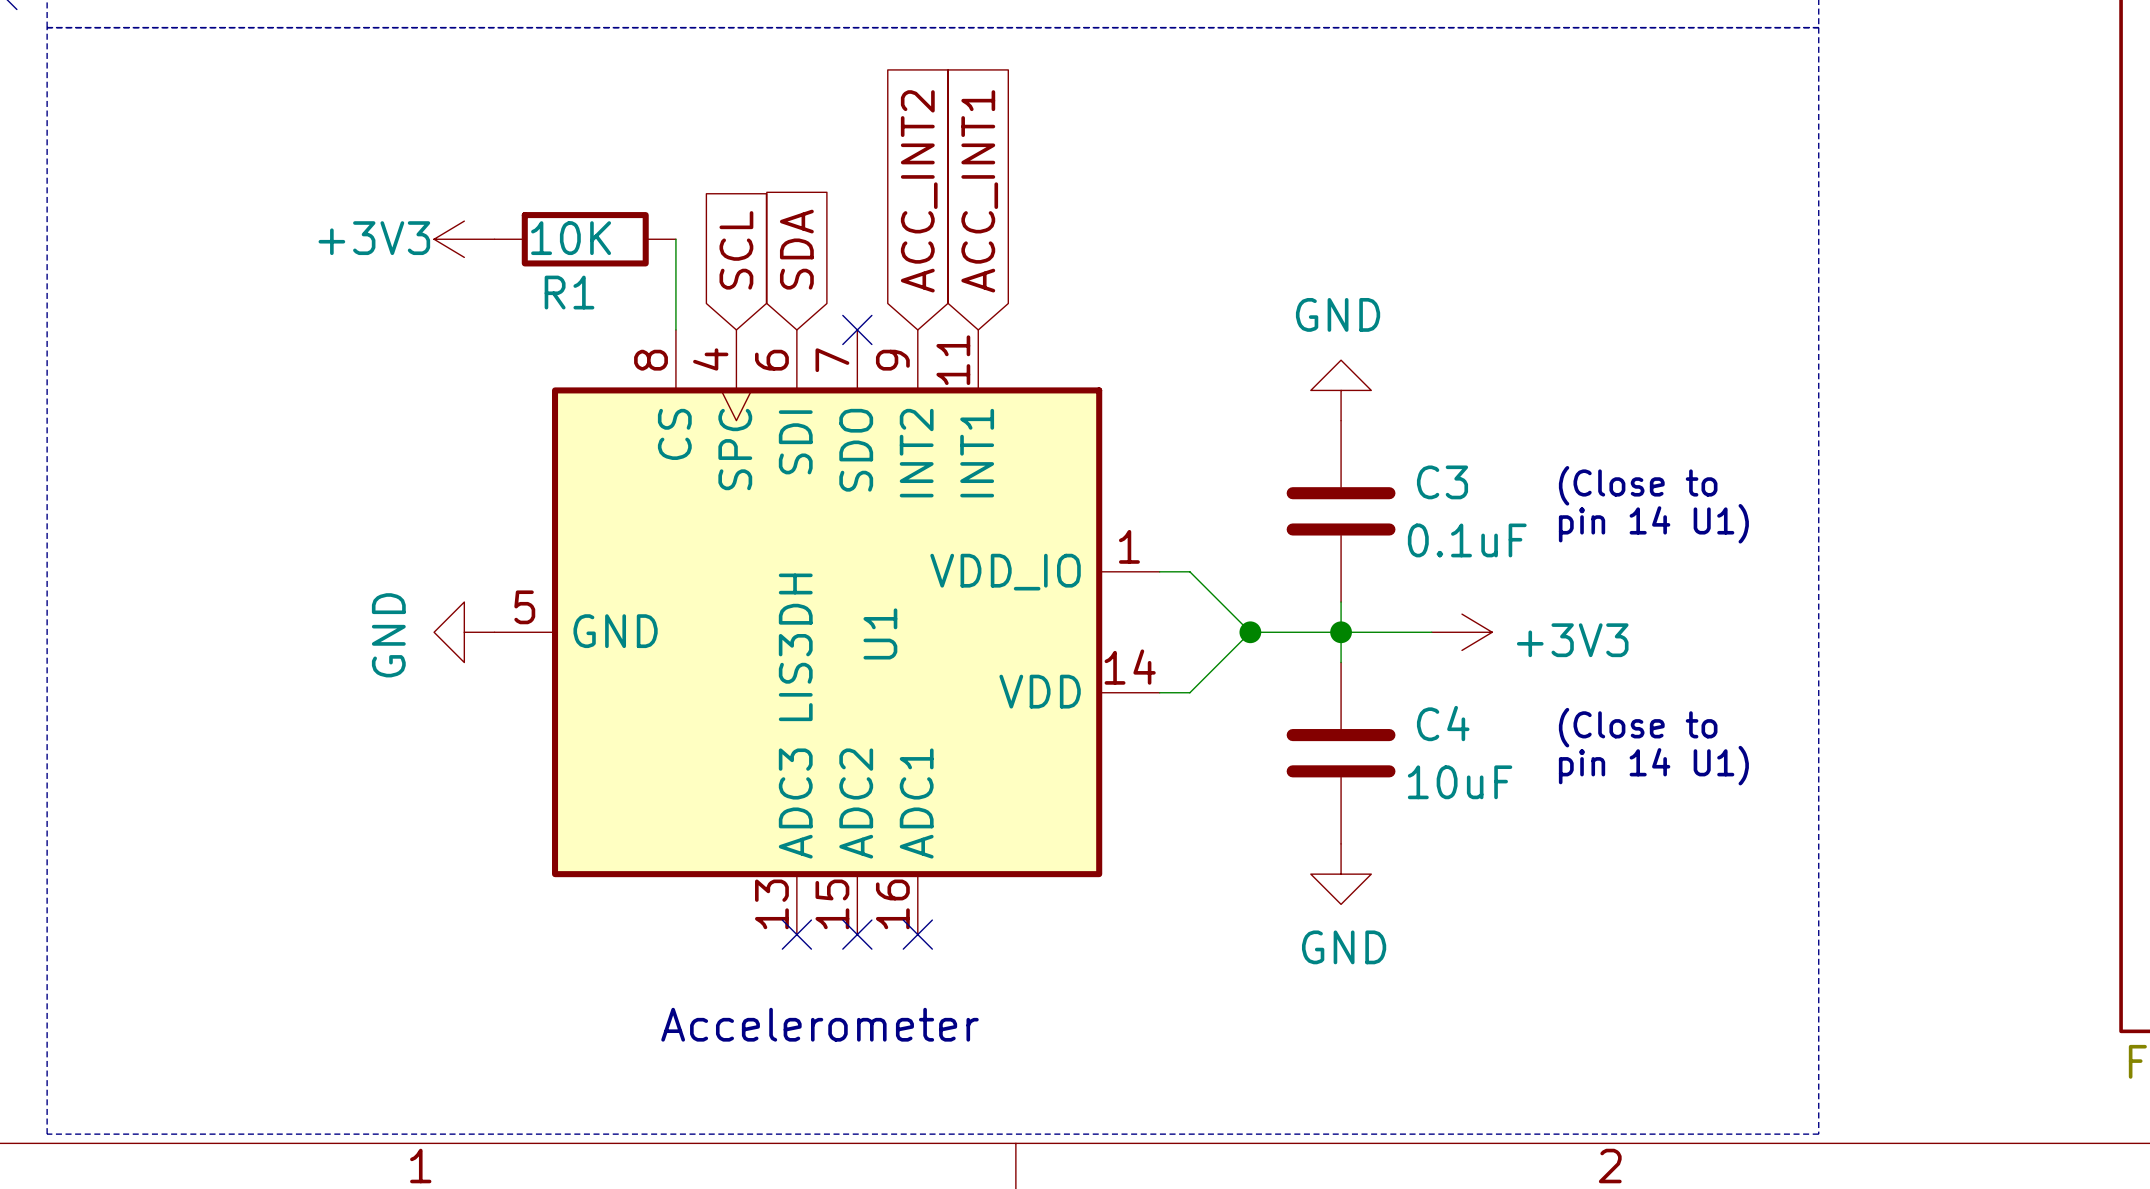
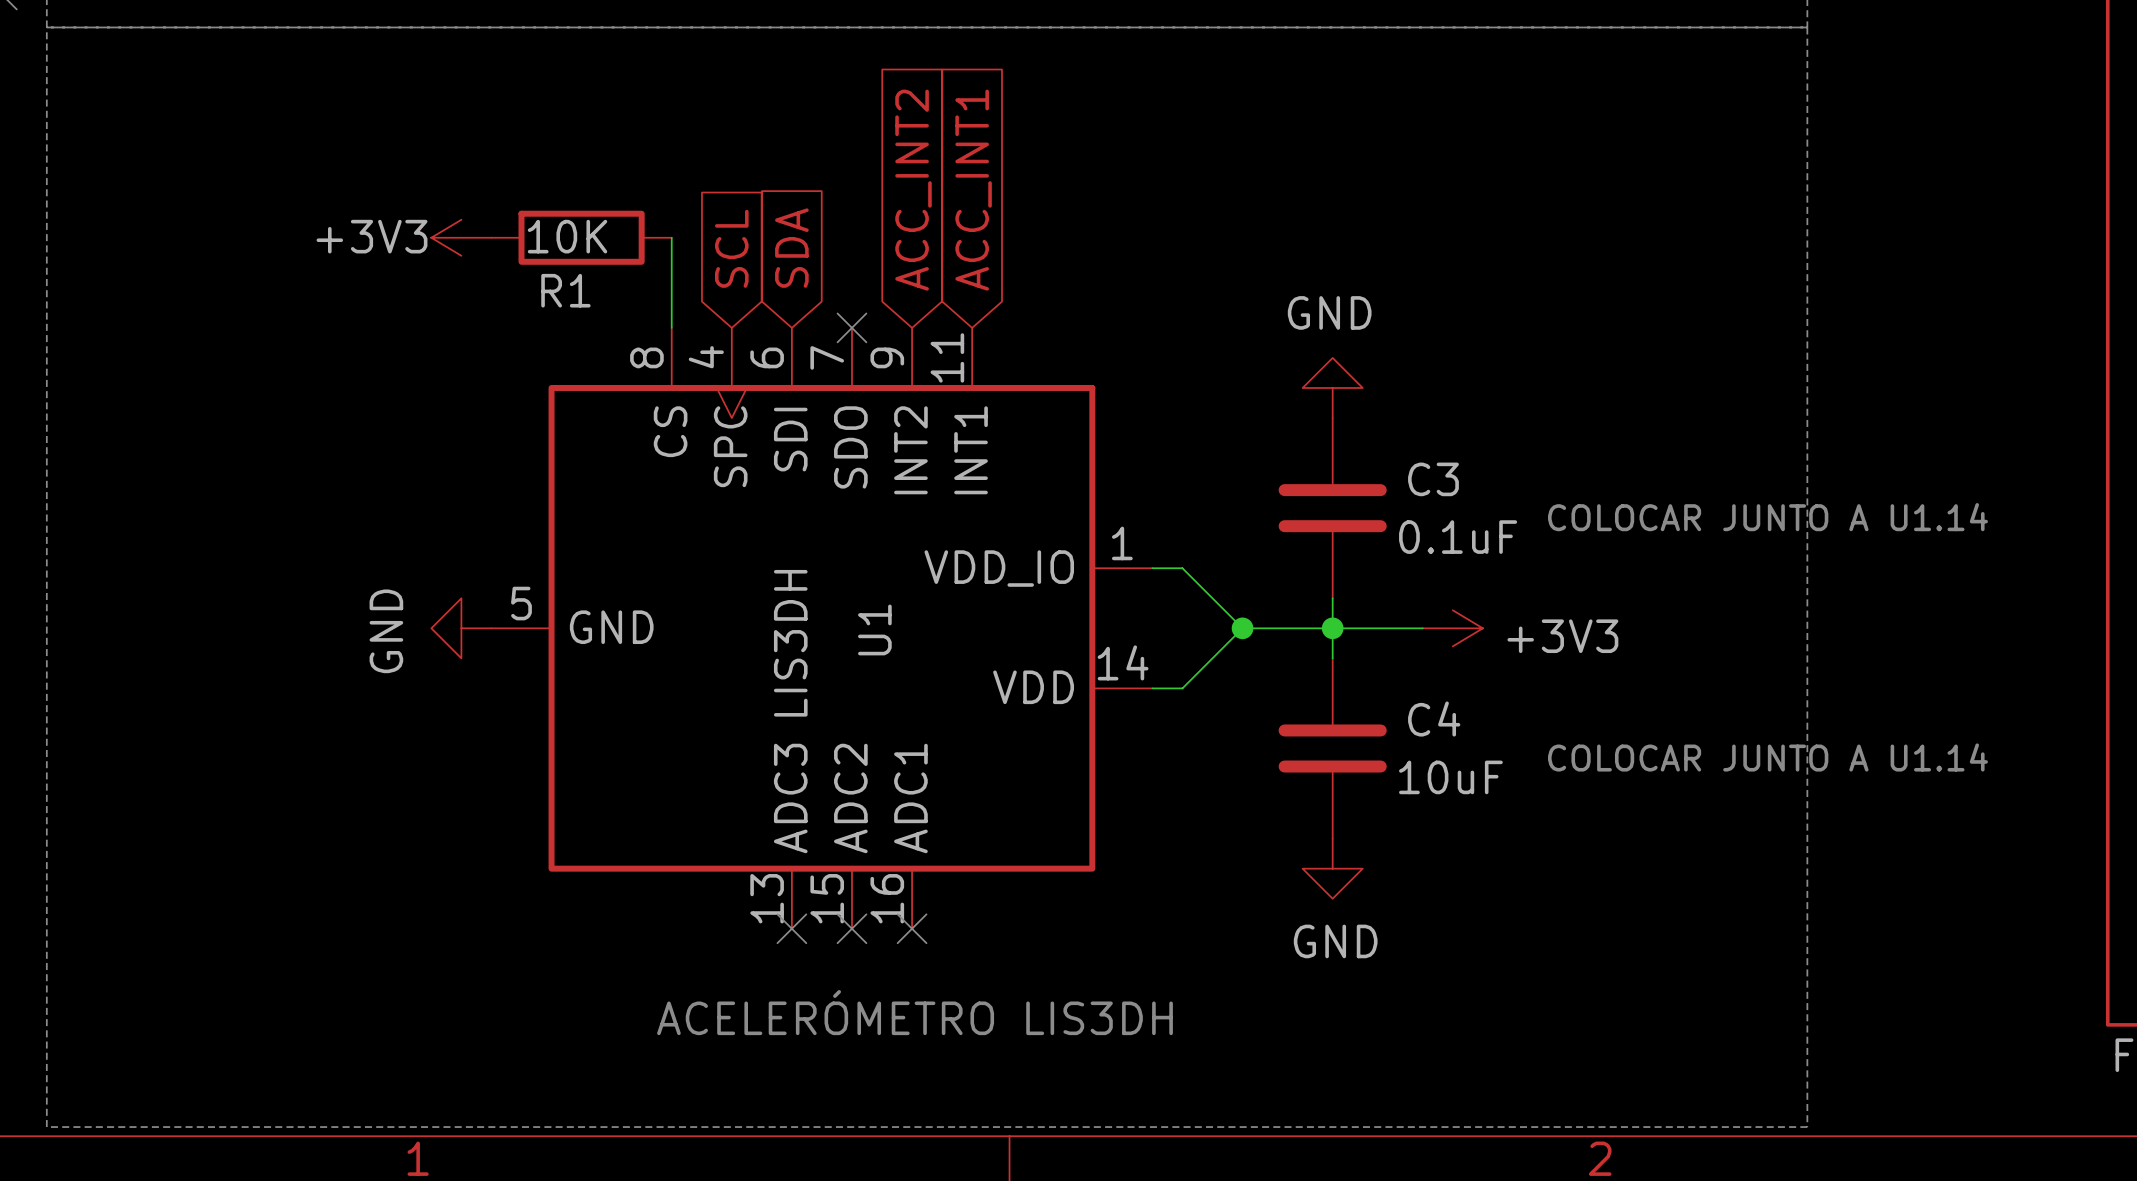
text: (Close to (1638, 485) -> none
text: pin 14 U1) (1653, 523) -> COLOCAR JUNTO A U1.14 (1767, 517)
text: (Close to (1638, 727) -> none
text: pin 14 U1) (1653, 765) -> COLOCAR JUNTO A U1.14 (1767, 757)
text: Accelerometer (819, 1024) -> ACELERÓMETRO LIS3DH (915, 1012)

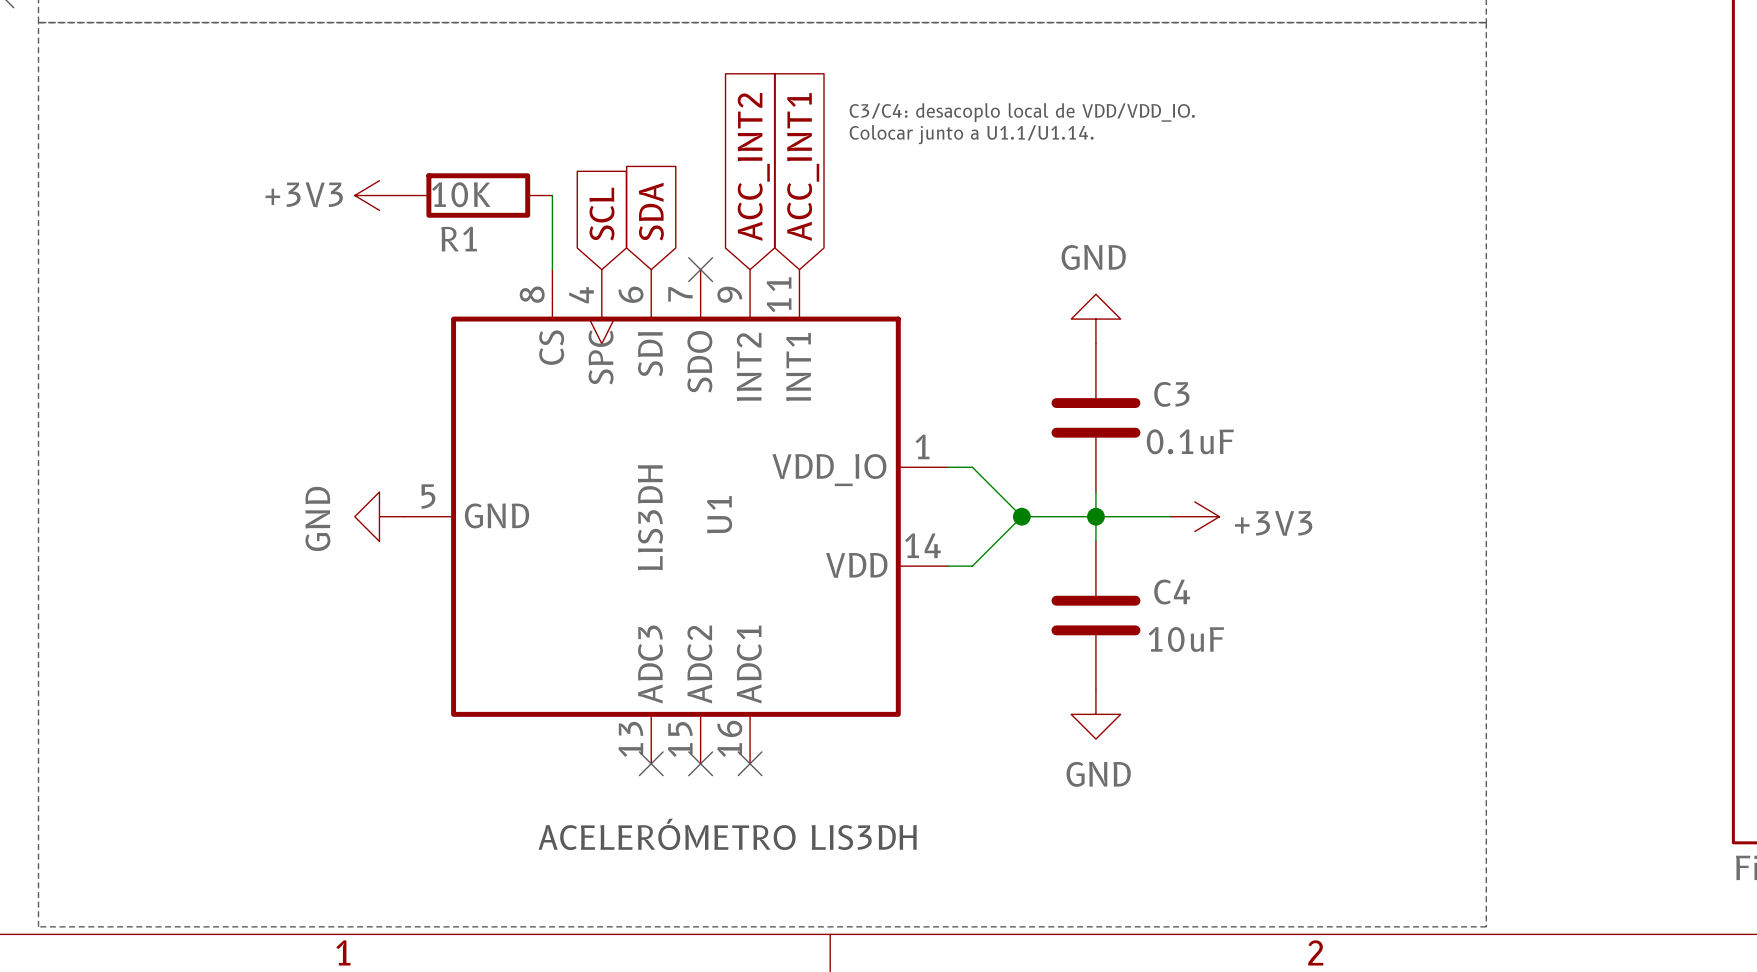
text: none -> C3/C4: desacoplo local de VDD/VDD_IO. (1022, 112)
text: none -> Colocar junto a U1.1/U1.14. (971, 134)
text: COLOCAR JUNTO A U1.14 (1767, 517) -> none
text: COLOCAR JUNTO A U1.14 (1767, 757) -> none

